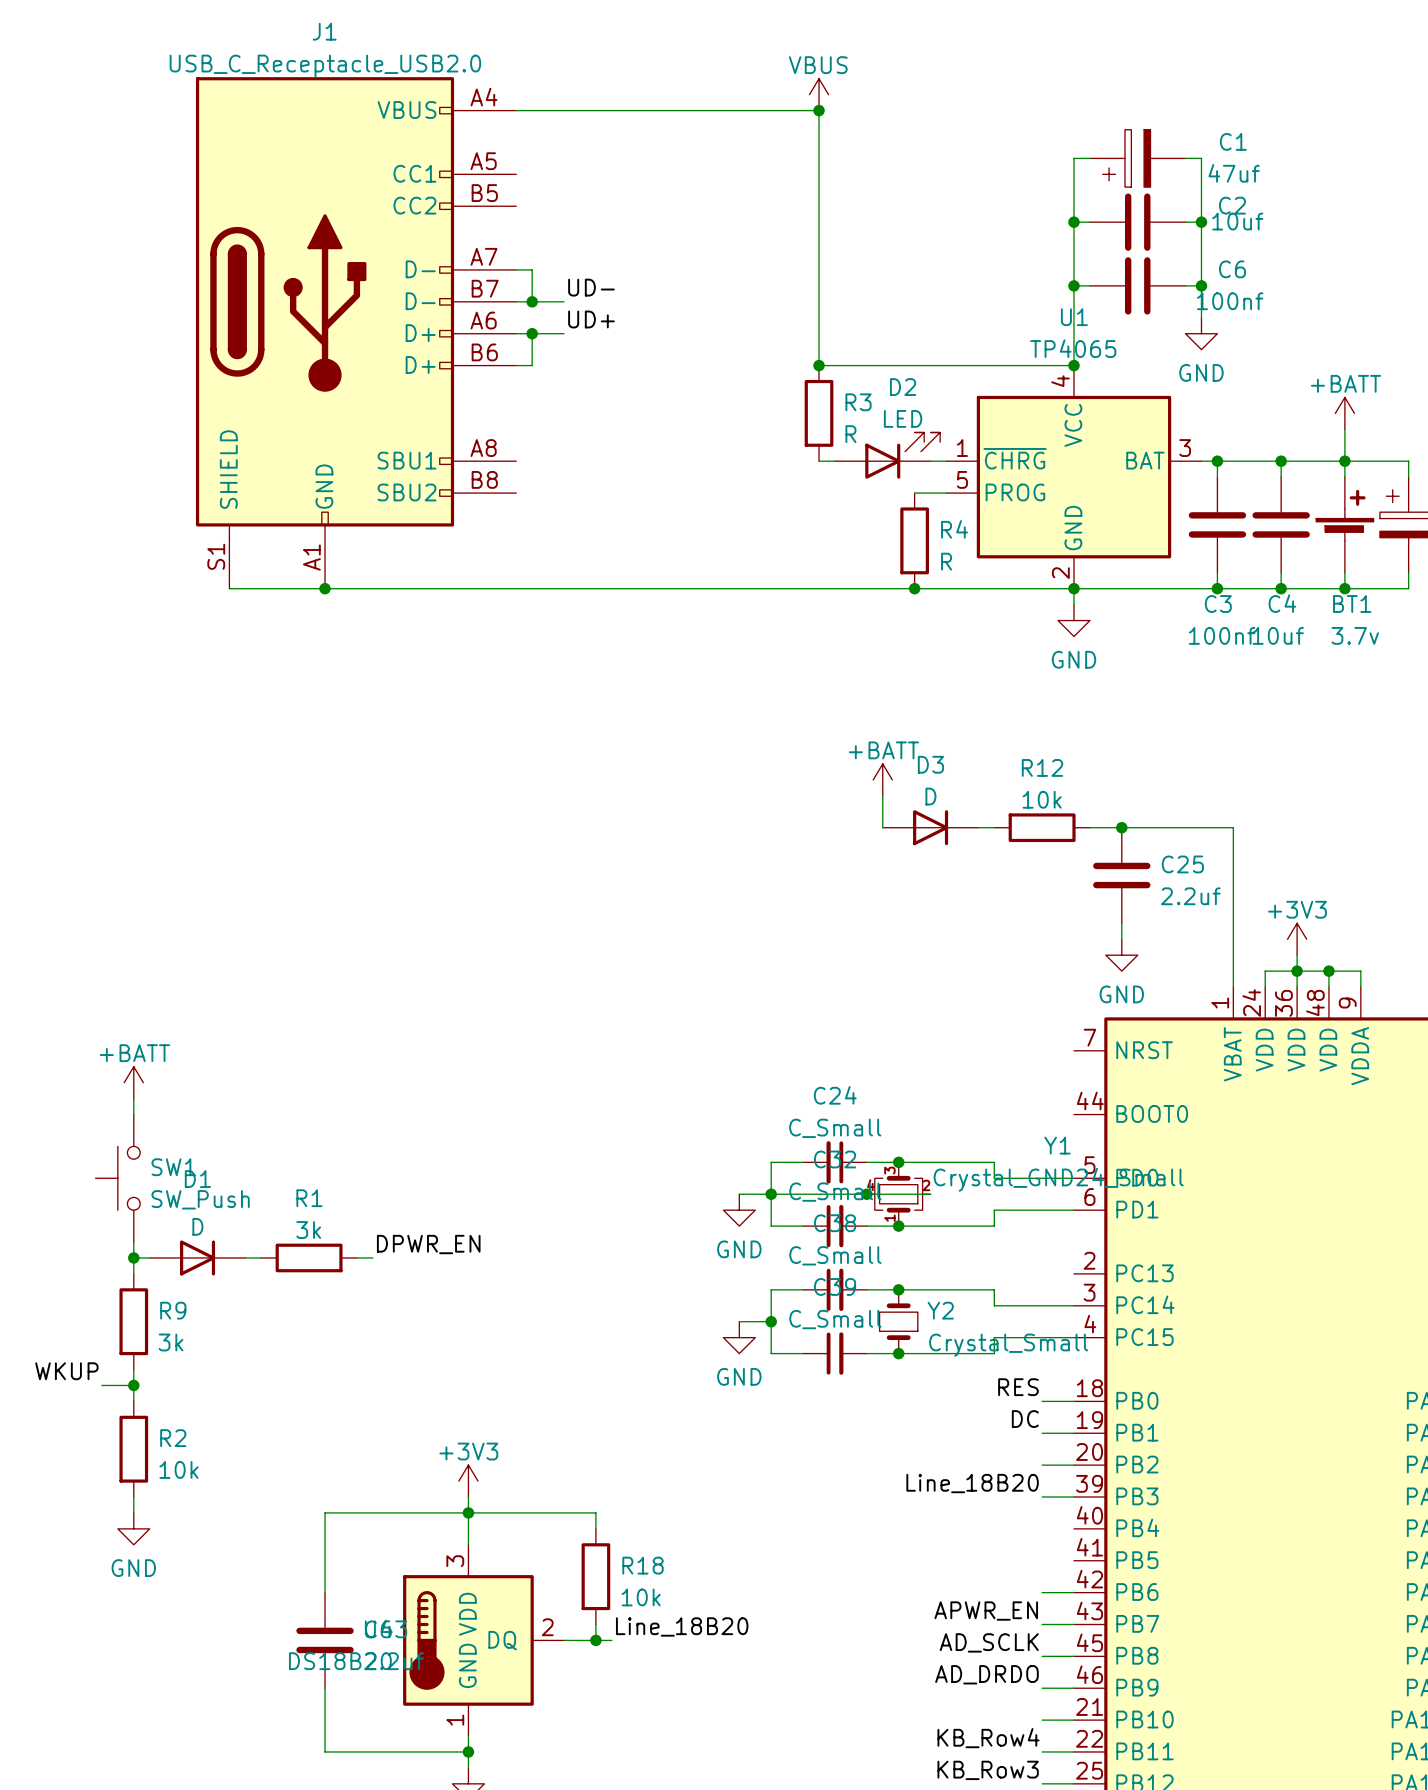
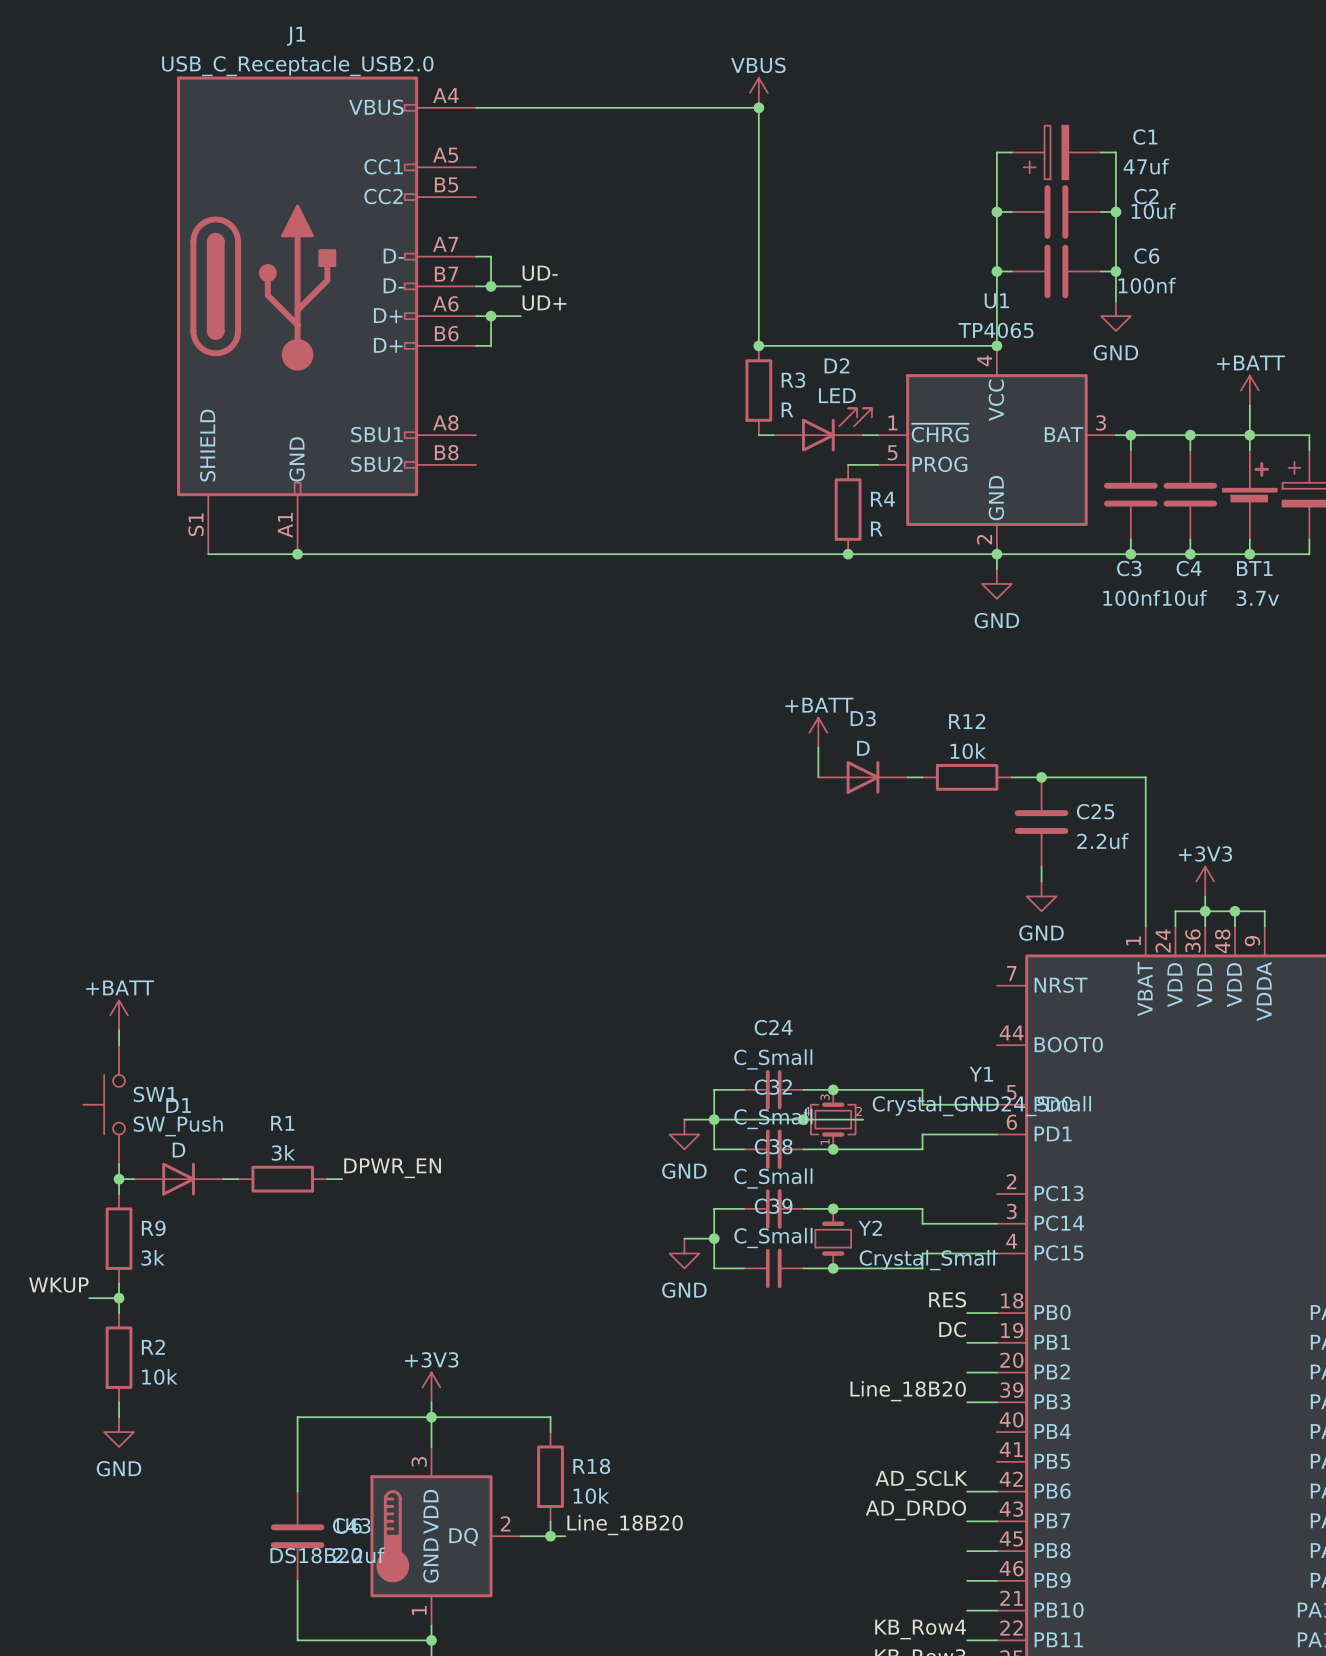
label: APWR_EN (986, 1611) -> AD_DRDO (915, 1510)
label position: AD_SCLK (989, 1642) -> AD_SCLK (921, 1480)
label: AD_DRDO (986, 1674) -> none

